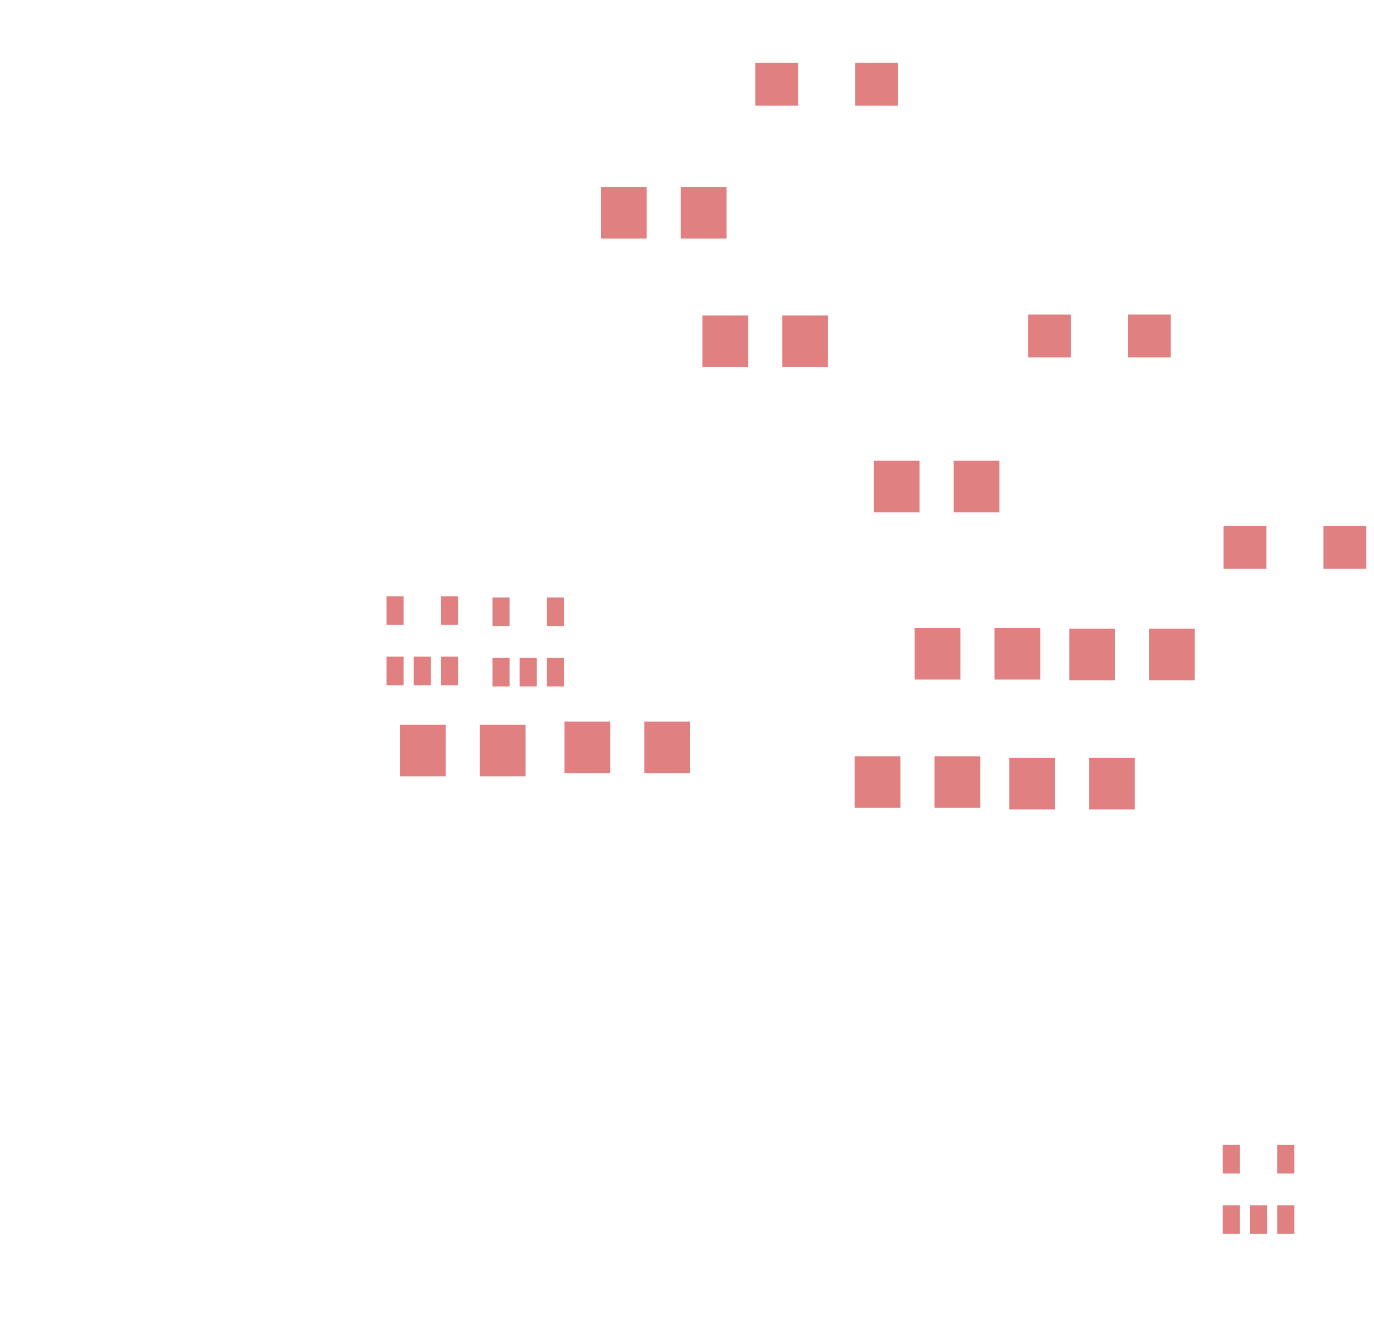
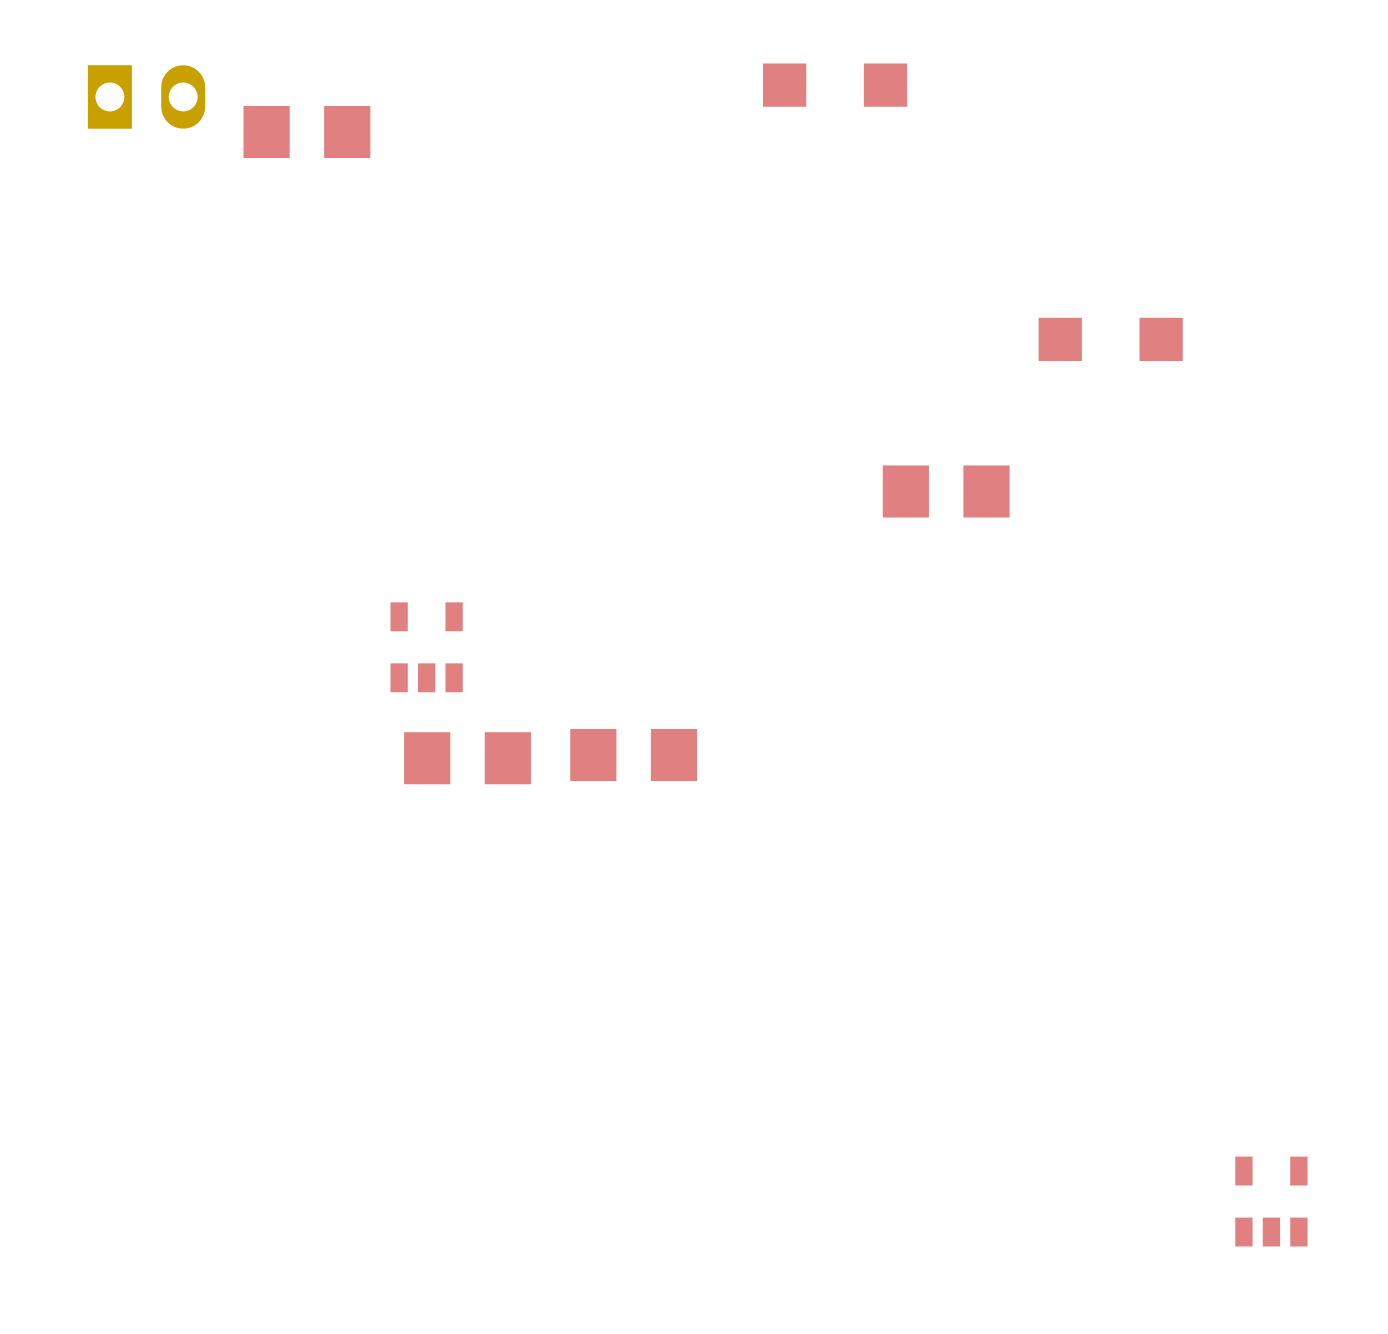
part: none -> (146, 96)
part: none -> (306, 131)
part: (663, 212) -> none
part: (765, 341) -> none
part: (1294, 547) -> none
part: (528, 641) -> none
part: (977, 653) -> none
part: (1132, 654) -> none
part: (917, 782) -> none
part: (1072, 783) -> none

